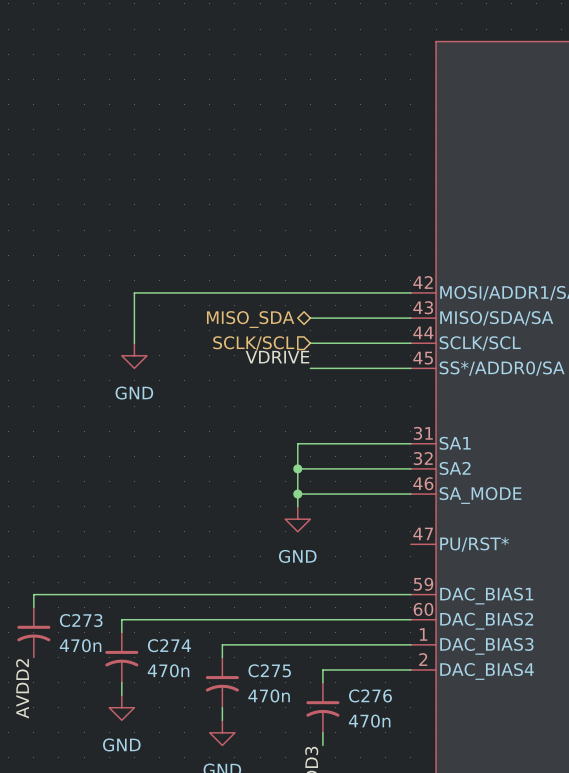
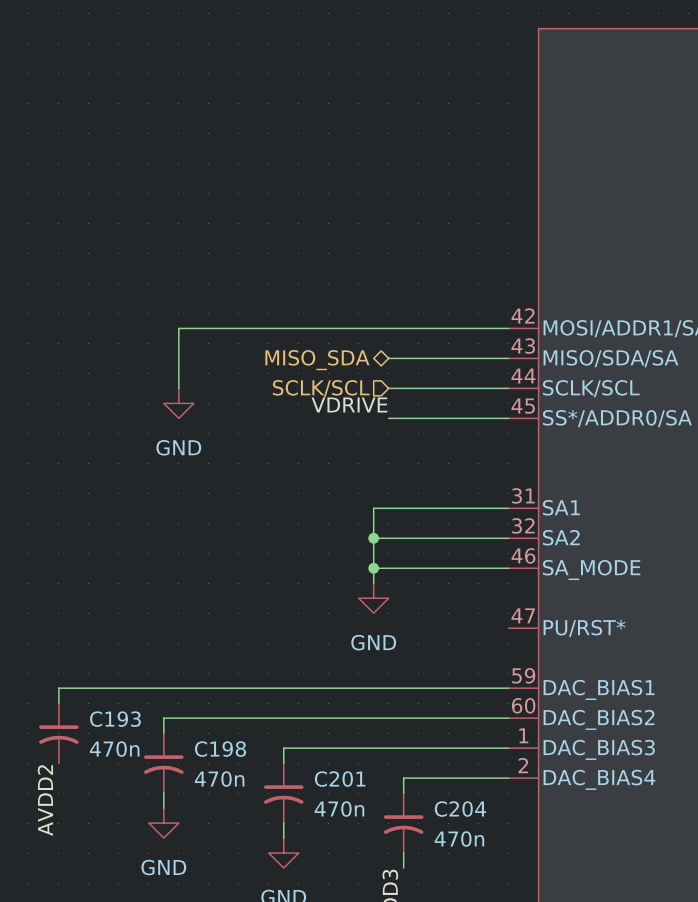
C273 name: C273 (81, 620) -> C193 (115, 719)
C274 name: C274 (169, 645) -> C198 (220, 749)
C275 name: C275 (269, 670) -> C201 (340, 779)
C276 name: C276 (370, 695) -> C204 (460, 809)

